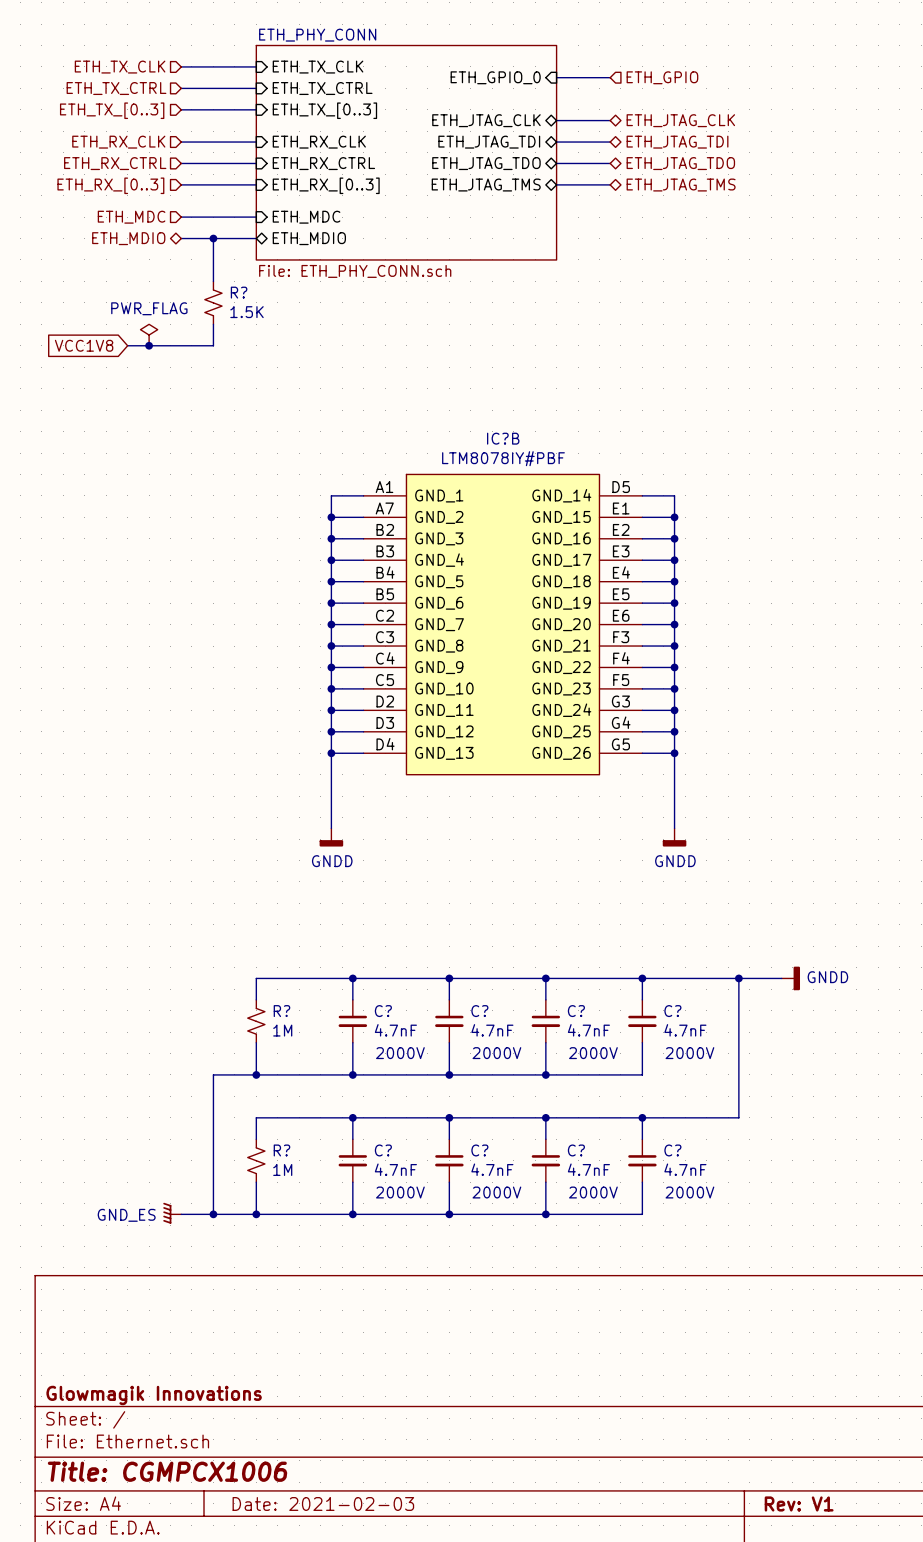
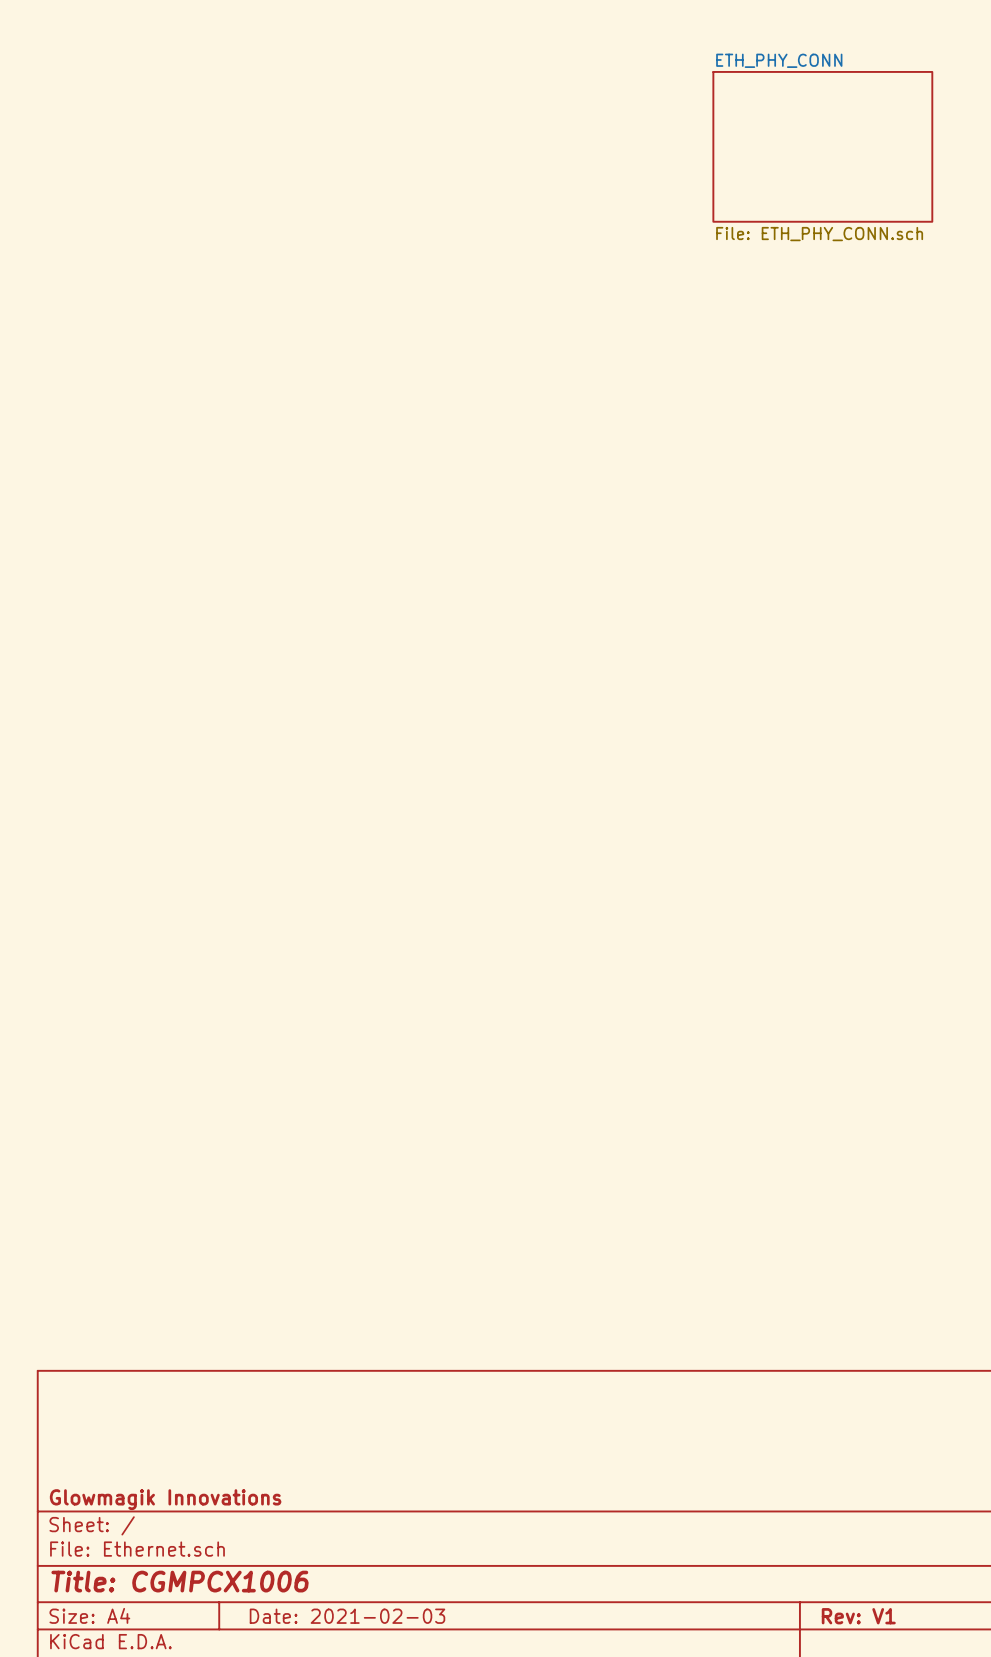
wire: (181, 66) (256, 66) -> none
hierarchical label: ETH_TX_CLK (120, 67) -> none
sheet pin: ETH_TX_CLK (318, 67) -> none
sheet pin: ETH_GPIO_0 (495, 77) -> none
wire: (556, 77) (610, 77) -> none
hierarchical label: ETH_GPIO (662, 77) -> none
hierarchical label: ETH_TX_CTRL (116, 88) -> none
wire: (181, 88) (256, 88) -> none
sheet pin: ETH_TX_CTRL (322, 88) -> none
bus: (181, 109) (256, 109) -> none
hierarchical label: ETH_TX_[0..3] (112, 110) -> none
sheet pin: ETH_TX_[0..3] (324, 110) -> none
sheet pin: ETH_JTAG_CLK (486, 120) -> none
wire: (556, 120) (610, 120) -> none
hierarchical label: ETH_JTAG_CLK (680, 120) -> none
sheet ETH_PHY_CONN: none -> File: ETH_PHY_CONN.sch (822, 146)
hierarchical label: ETH_RX_CLK (118, 142) -> none
wire: (181, 142) (256, 142) -> none
sheet pin: ETH_RX_CLK (319, 142) -> none
sheet pin: ETH_JTAG_TDI (489, 142) -> none
wire: (556, 142) (610, 142) -> none
hierarchical label: ETH_JTAG_TDI (677, 142) -> none
sheet ETH_PHY_CONN: File: ETH_PHY_CONN.sch (406, 152) -> none
hierarchical label: ETH_RX_CTRL (115, 163) -> none
wire: (181, 163) (256, 163) -> none
sheet pin: ETH_RX_CTRL (323, 163) -> none
sheet pin: ETH_JTAG_TDO (486, 163) -> none
wire: (556, 163) (610, 163) -> none
hierarchical label: ETH_JTAG_TDO (680, 163) -> none
bus: (181, 184) (256, 184) -> none
wire: (556, 184) (610, 184) -> none
hierarchical label: ETH_RX_[0..3] (110, 185) -> none
sheet pin: ETH_RX_[0..3] (326, 185) -> none
sheet pin: ETH_JTAG_TMS (486, 185) -> none
hierarchical label: ETH_JTAG_TMS (681, 185) -> none
hierarchical label: ETH_MDC (131, 217) -> none
wire: (181, 217) (256, 217) -> none
sheet pin: ETH_MDC (306, 217) -> none
hierarchical label: ETH_MDIO (128, 238) -> none
wire: (181, 238) (256, 238) -> none
wire: (213, 238) (213, 281) -> none
junction: (213, 238) -> none
sheet pin: ETH_MDIO (309, 238) -> none
R?: 1.5K (213, 302) -> none
wire: (213, 324) (213, 345) (127, 345) -> none
power symbol: PWR_FLAG (149, 335) -> none
global label: VCC1V8 (84, 345) -> none
junction: (149, 345) -> none
wire: (363, 495) (331, 495) (331, 828) -> none
wire: (642, 495) (674, 495) (674, 828) -> none
wire: (331, 517) (363, 517) -> none
junction: (331, 517) -> none
wire: (642, 517) (674, 517) -> none
junction: (674, 517) -> none
wire: (331, 538) (363, 538) -> none
junction: (331, 538) -> none
wire: (642, 538) (674, 538) -> none
junction: (674, 538) -> none
wire: (331, 560) (363, 560) -> none
junction: (331, 560) -> none
wire: (642, 560) (674, 560) -> none
junction: (674, 560) -> none
wire: (331, 581) (363, 581) -> none
junction: (331, 581) -> none
wire: (642, 581) (674, 581) -> none
junction: (674, 581) -> none
wire: (331, 603) (363, 603) -> none
junction: (331, 603) -> none
wire: (642, 603) (674, 603) -> none
junction: (674, 603) -> none
wire: (331, 624) (363, 624) -> none
junction: (331, 624) -> none
IC?B: LTM8078IY#PBF (502, 624) -> none
wire: (642, 624) (674, 624) -> none
junction: (674, 624) -> none
wire: (331, 646) (363, 646) -> none
junction: (331, 646) -> none
wire: (642, 646) (674, 646) -> none
junction: (674, 646) -> none
wire: (331, 667) (363, 667) -> none
junction: (331, 667) -> none
wire: (642, 667) (674, 667) -> none
junction: (674, 667) -> none
wire: (331, 688) (363, 688) -> none
junction: (331, 688) -> none
wire: (642, 688) (674, 688) -> none
junction: (674, 688) -> none
wire: (331, 710) (363, 710) -> none
junction: (331, 710) -> none
wire: (642, 710) (674, 710) -> none
junction: (674, 710) -> none
wire: (331, 731) (363, 731) -> none
junction: (331, 731) -> none
wire: (642, 731) (674, 731) -> none
junction: (674, 731) -> none
wire: (331, 753) (363, 753) -> none
junction: (331, 753) -> none
wire: (642, 753) (674, 753) -> none
junction: (674, 753) -> none
power symbol: GNDD (331, 837) -> none
power symbol: GNDD (674, 837) -> none
wire: (352, 978) (352, 999) -> none
junction: (352, 978) -> none
wire: (449, 978) (449, 999) -> none
junction: (449, 978) -> none
wire: (545, 978) (545, 999) -> none
junction: (545, 978) -> none
wire: (642, 978) (642, 999) -> none
junction: (642, 978) -> none
wire: (738, 978) (738, 1117) (256, 1117) (256, 1139) -> none
junction: (738, 978) -> none
wire: (781, 978) (256, 978) (256, 999) -> none
power symbol: GNDD (790, 978) -> none
R?: 1M (256, 1021) -> none
C?: 4.7nF (352, 1021) -> none
C?: 4.7nF (449, 1021) -> none
C?: 4.7nF (545, 1021) -> none
C?: 4.7nF (642, 1021) -> none
wire: (256, 1042) (256, 1074) -> none
wire: (352, 1042) (352, 1074) -> none
wire: (449, 1042) (449, 1074) -> none
wire: (545, 1042) (545, 1074) -> none
wire: (642, 1042) (642, 1074) (213, 1074) (213, 1214) -> none
junction: (256, 1074) -> none
junction: (352, 1074) -> none
junction: (449, 1074) -> none
junction: (545, 1074) -> none
wire: (352, 1117) (352, 1139) -> none
junction: (352, 1117) -> none
wire: (449, 1117) (449, 1139) -> none
junction: (449, 1117) -> none
wire: (545, 1117) (545, 1139) -> none
junction: (545, 1117) -> none
wire: (642, 1117) (642, 1139) -> none
junction: (642, 1117) -> none
R?: 1M (256, 1160) -> none
C?: 4.7nF (352, 1160) -> none
C?: 4.7nF (449, 1160) -> none
C?: 4.7nF (545, 1160) -> none
C?: 4.7nF (642, 1160) -> none
wire: (256, 1182) (256, 1214) -> none
wire: (352, 1182) (352, 1214) -> none
wire: (449, 1182) (449, 1214) -> none
wire: (545, 1182) (545, 1214) -> none
wire: (642, 1182) (642, 1214) (181, 1214) -> none
power symbol: GND_ES (172, 1213) -> none
junction: (213, 1214) -> none
junction: (256, 1214) -> none
junction: (352, 1214) -> none
junction: (449, 1214) -> none
junction: (545, 1214) -> none

